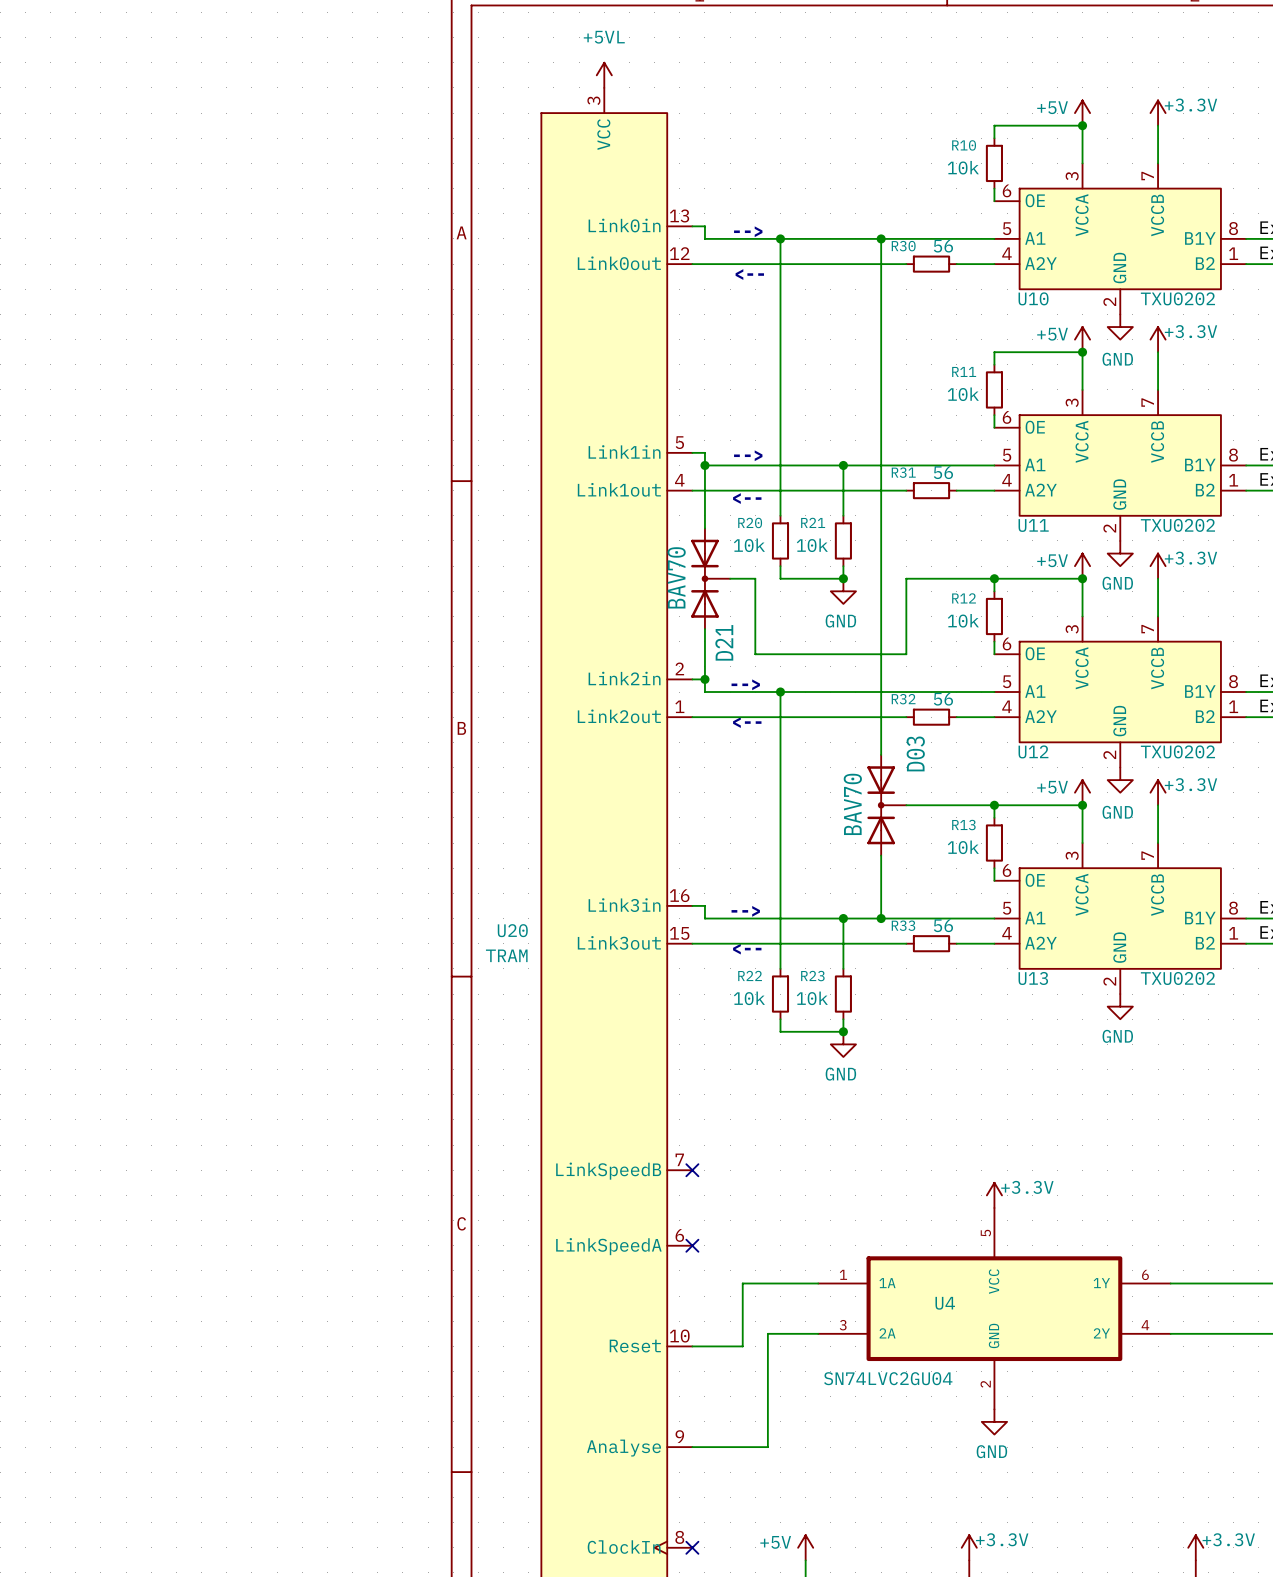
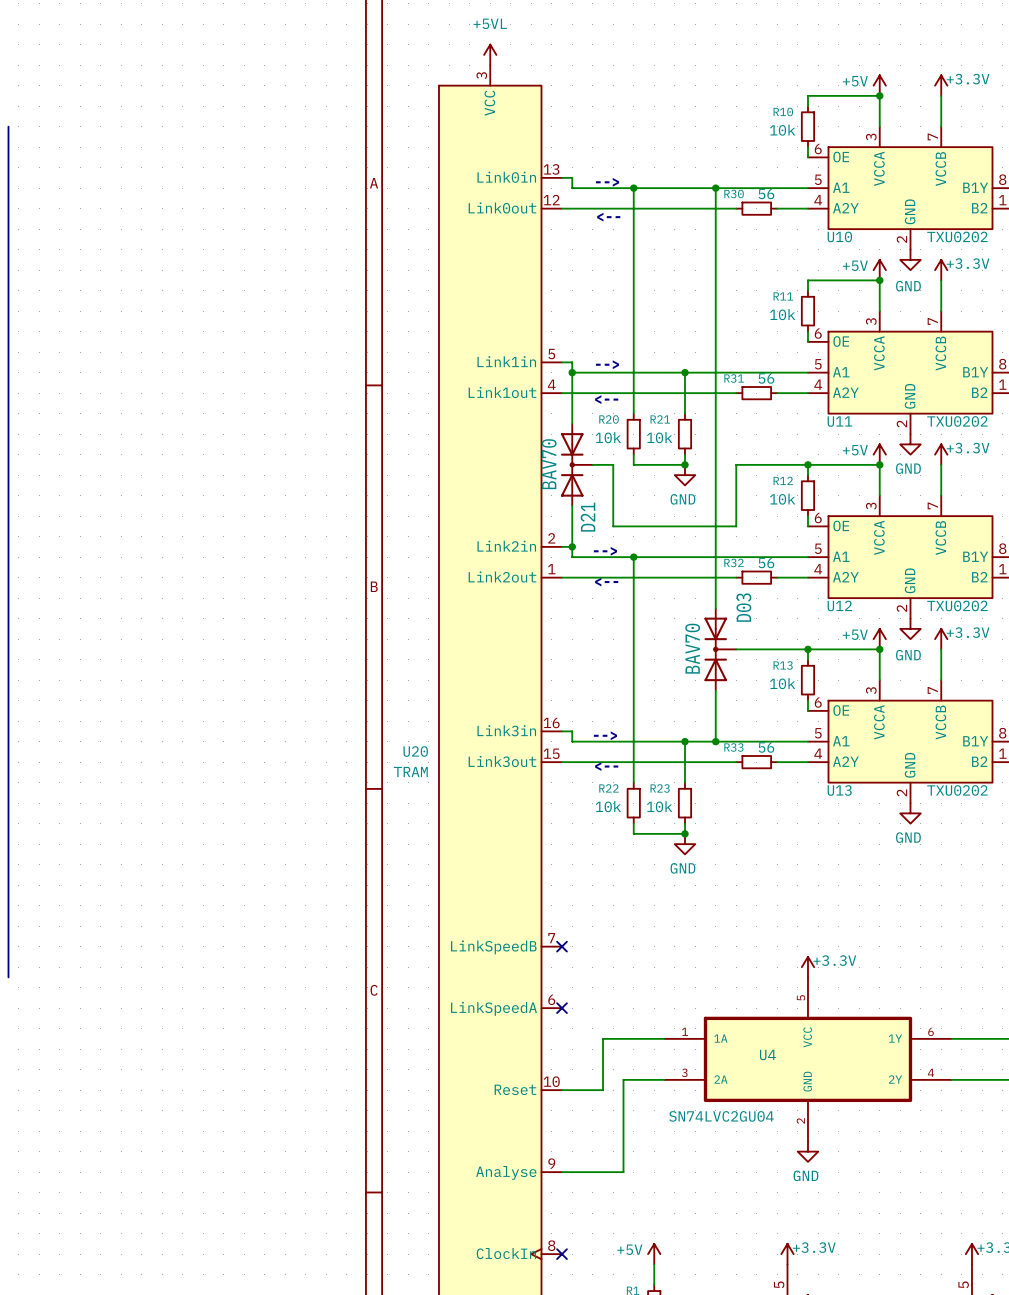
line: none -> (8, 126) (8, 977)

